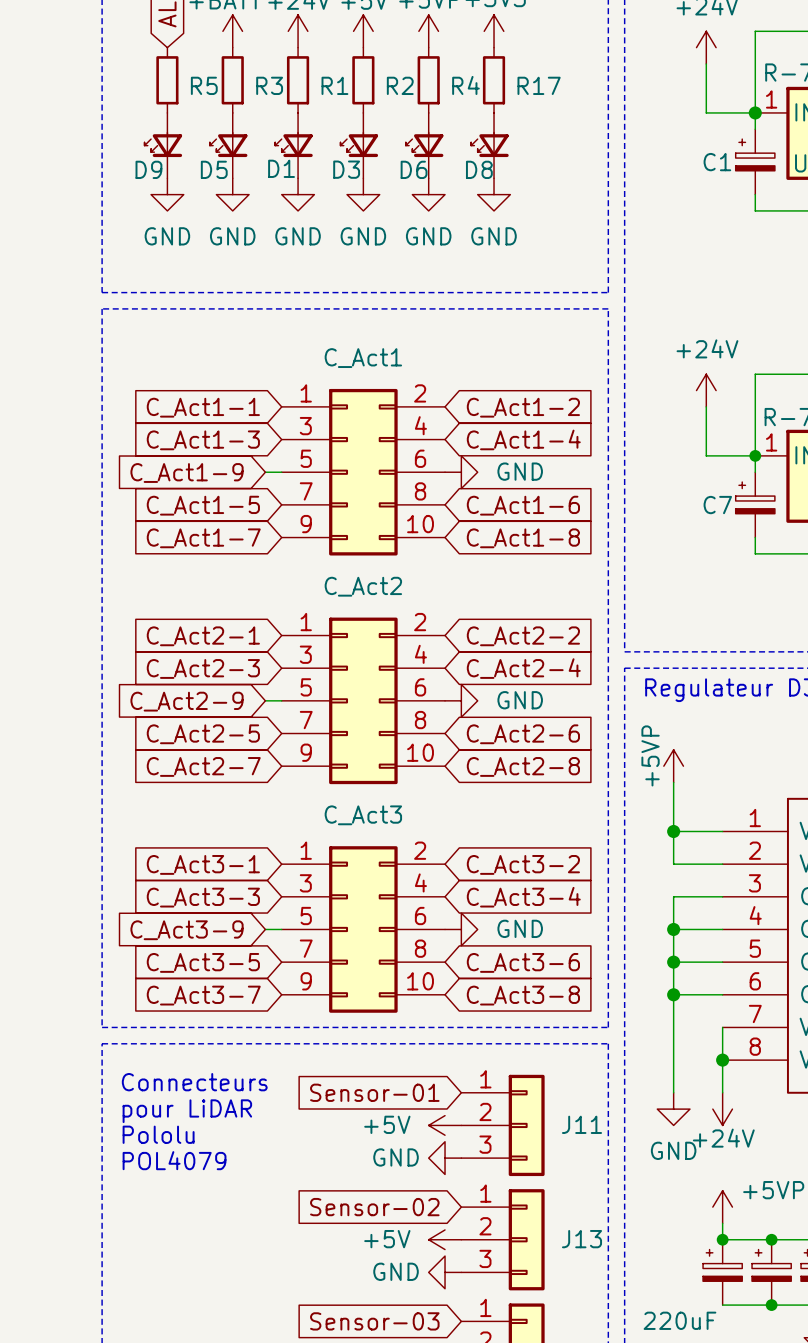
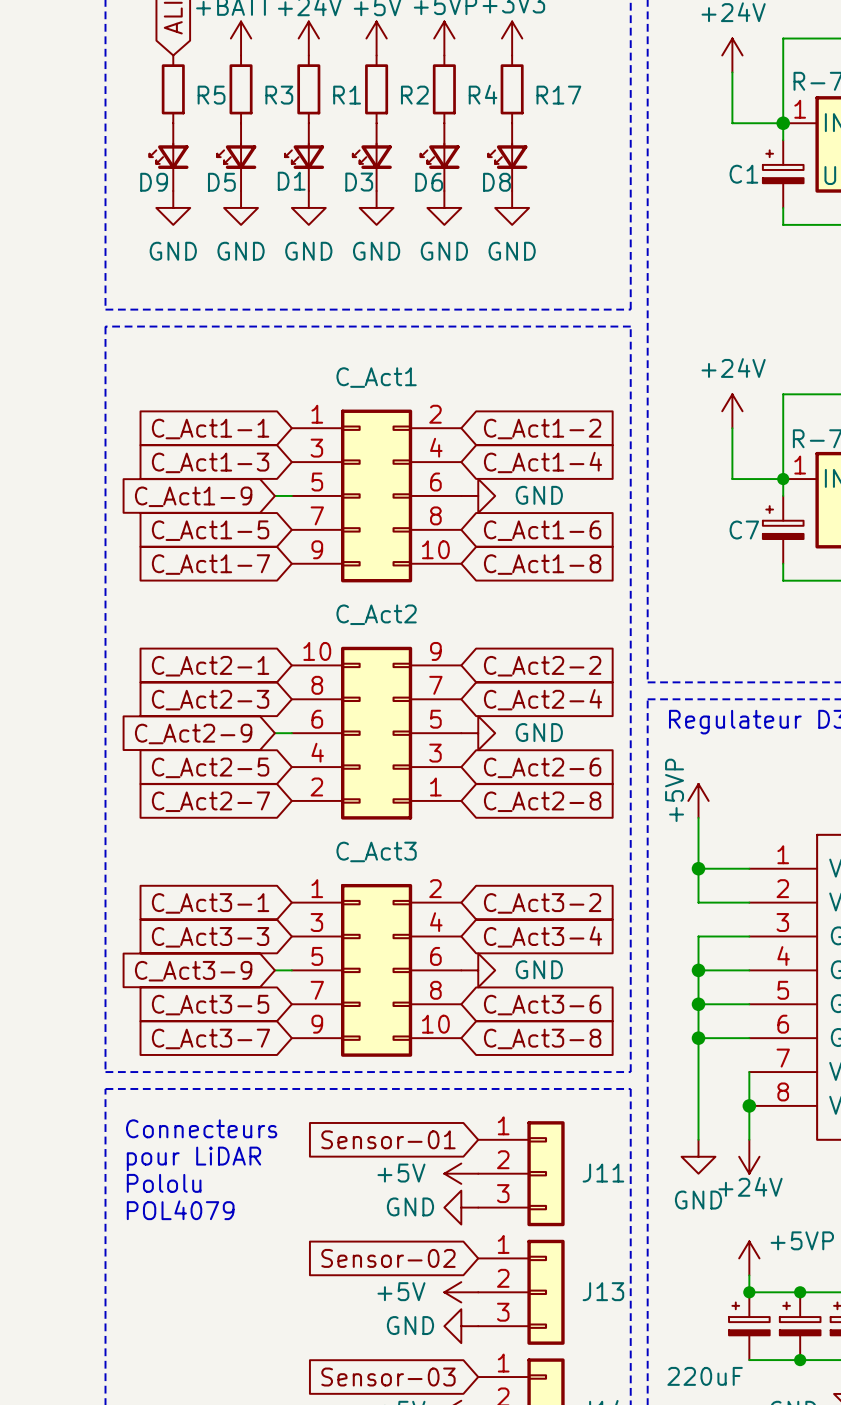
C_Act2 rotation: 0° (363, 700) -> 180° (376, 733)

